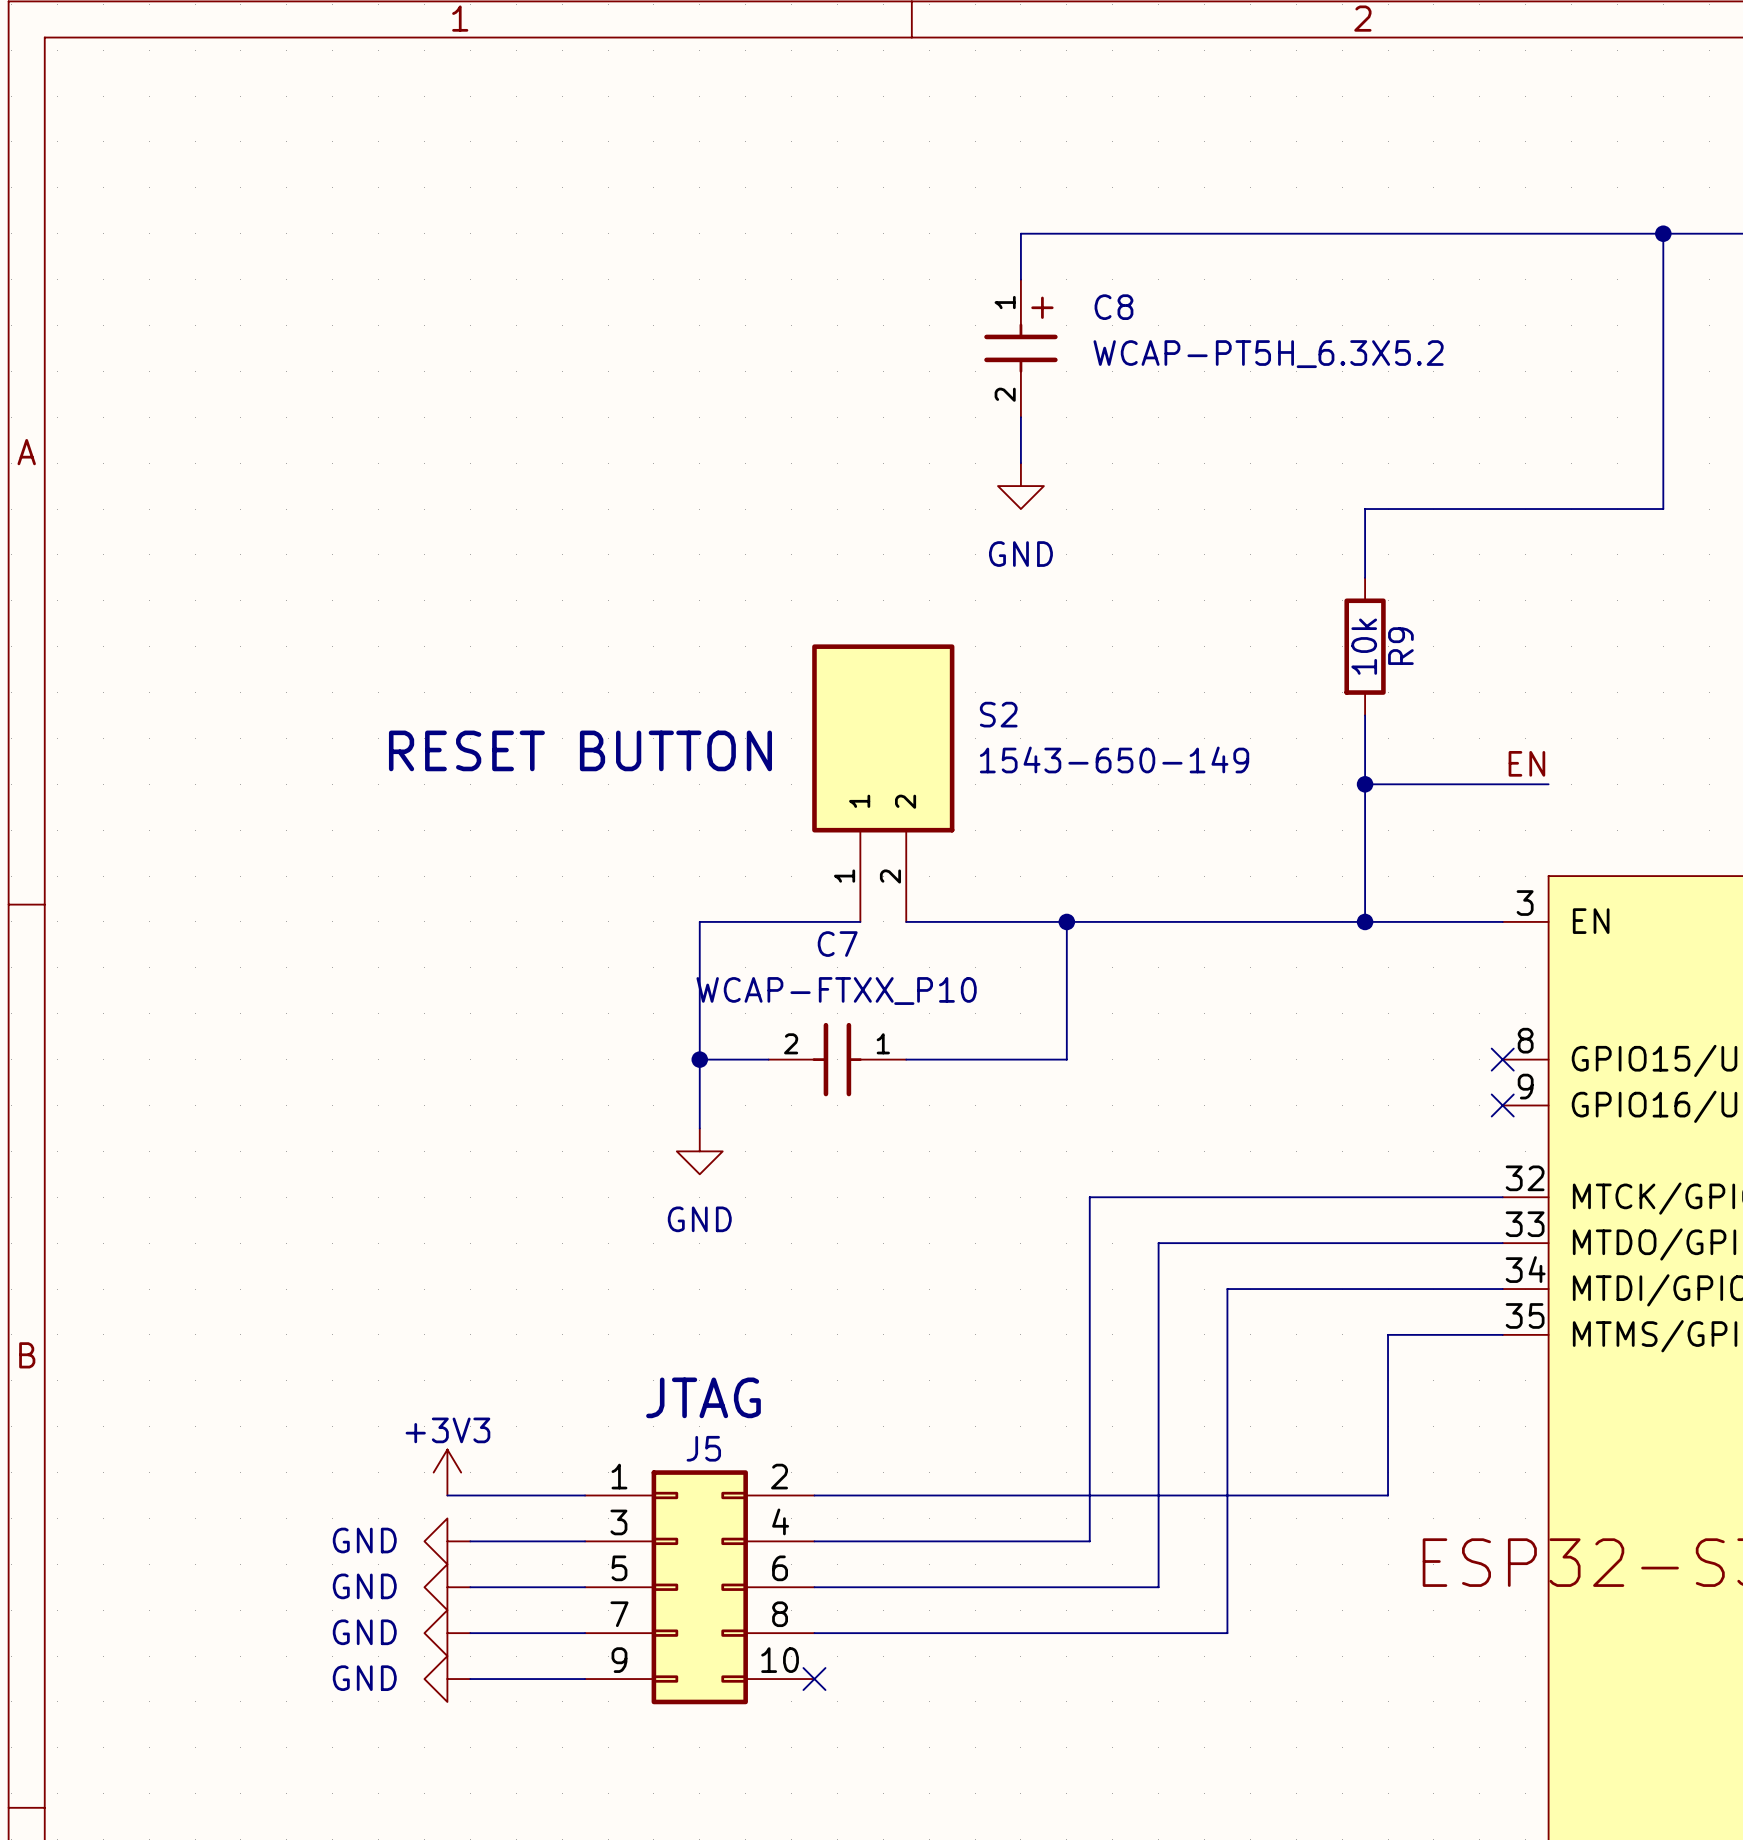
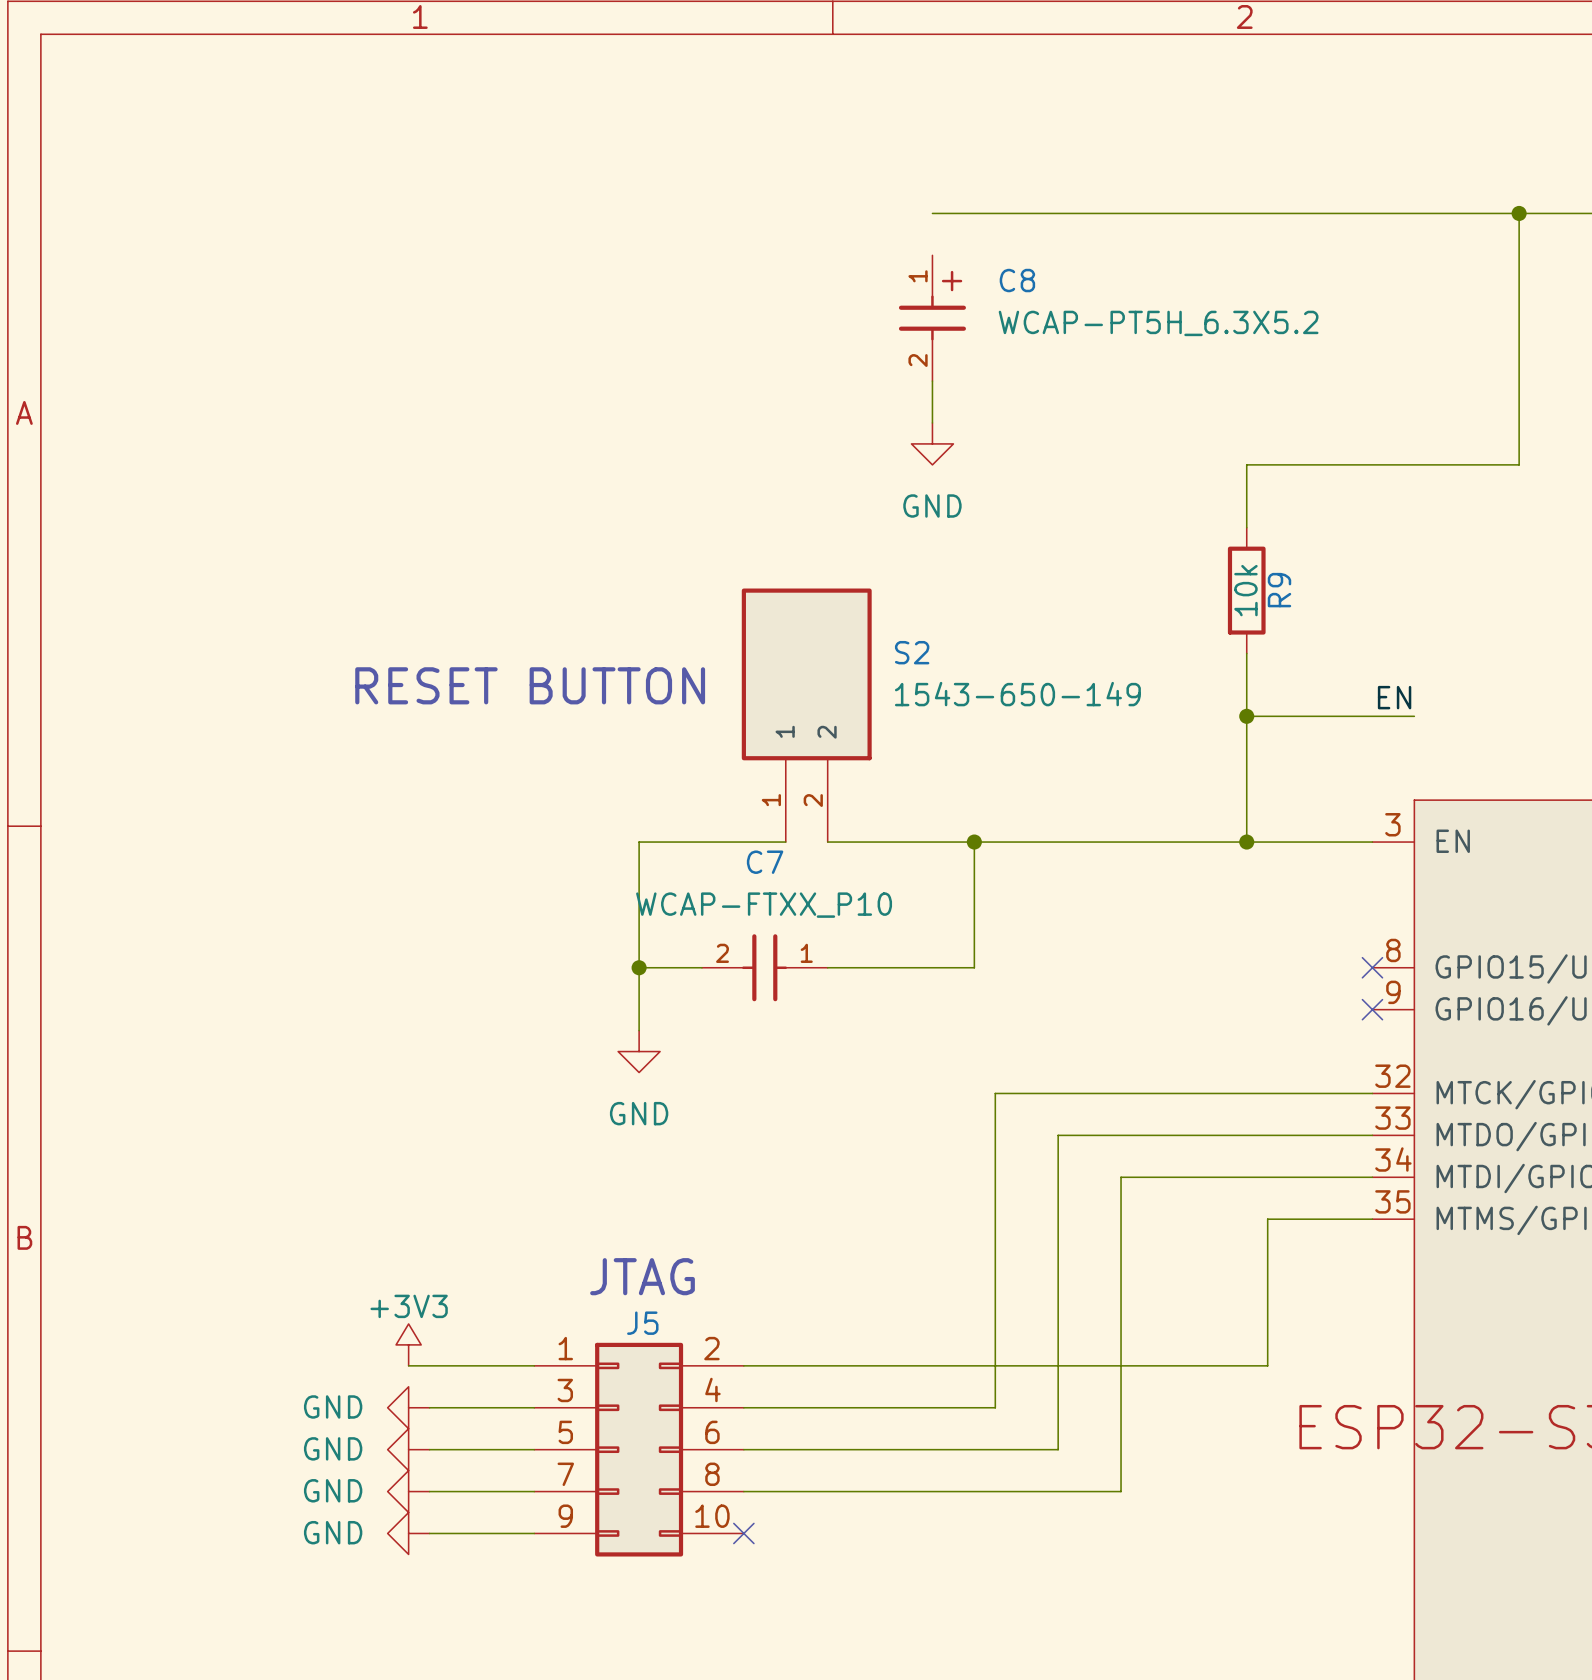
wire: (1020, 233) (1020, 279) -> none
power symbol shape: [433, 1449, 462, 1496] -> [396, 1323, 422, 1366]

